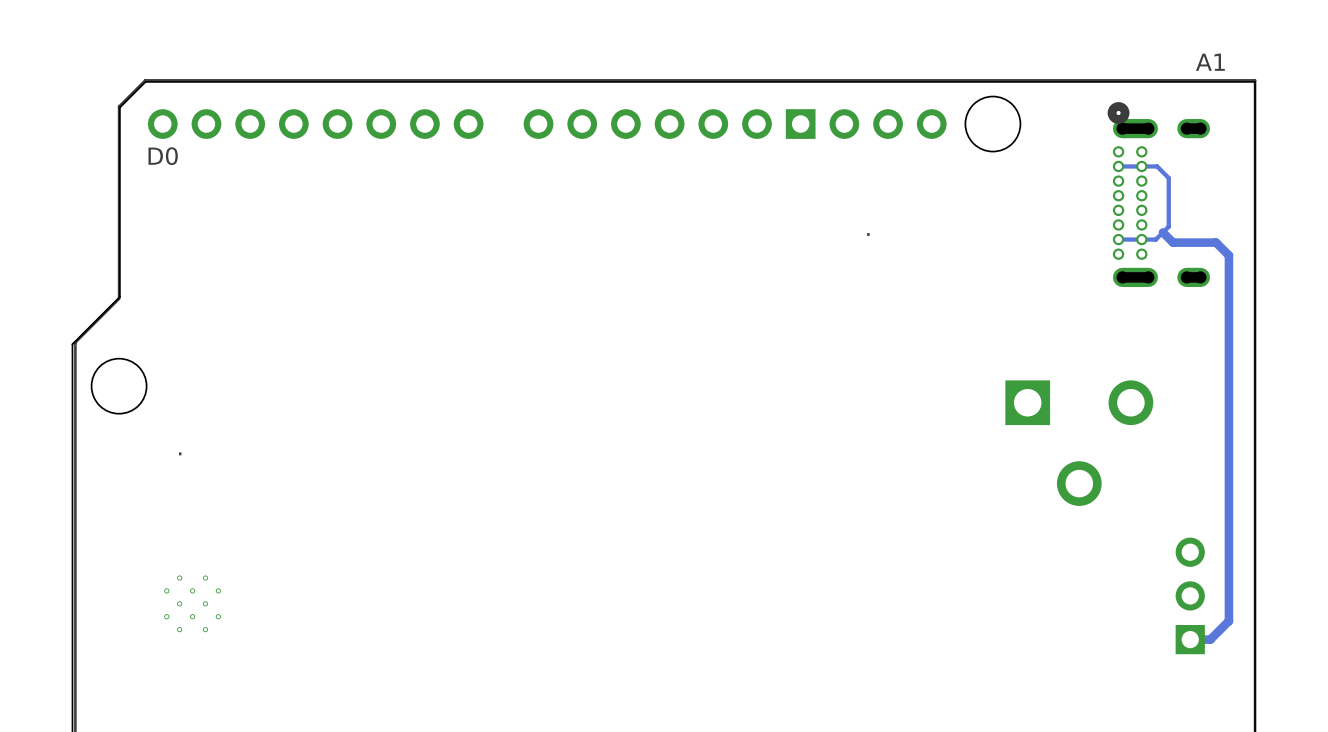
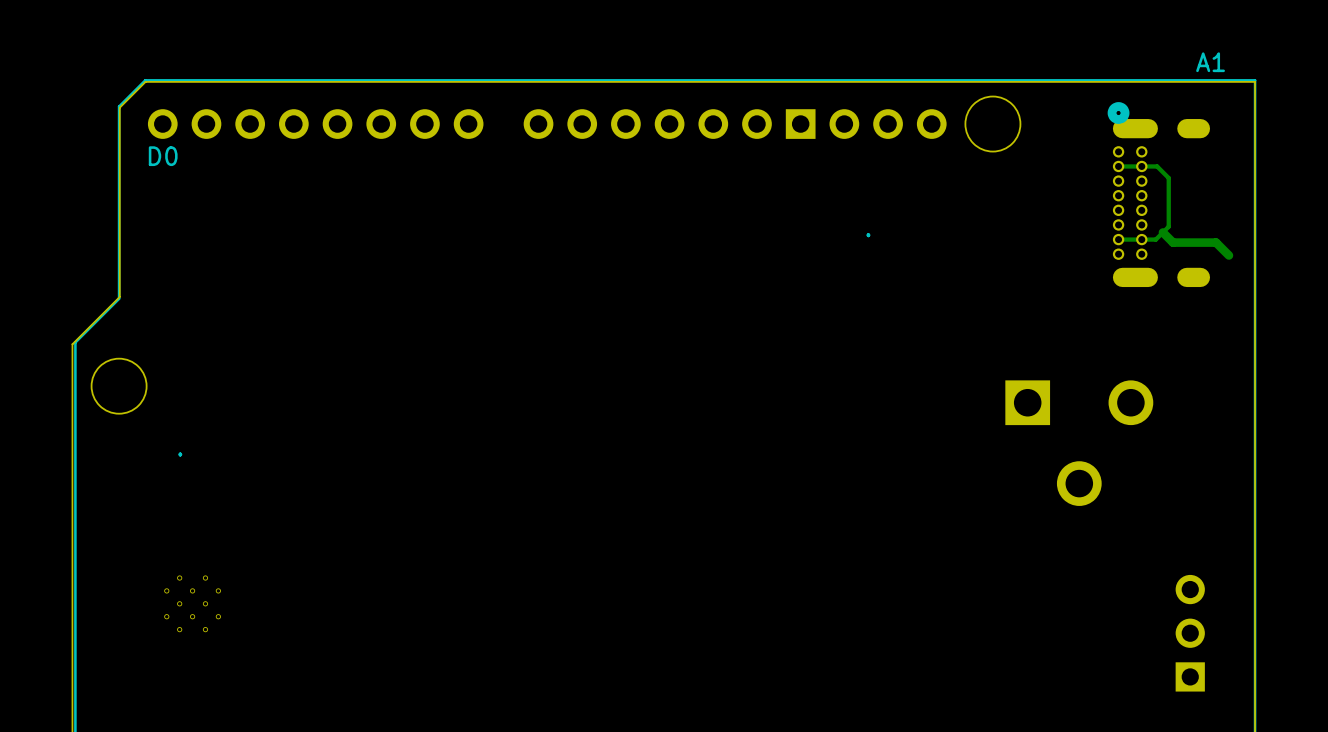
track: (1228, 255) (1228, 621) (1210, 639) (1190, 639) -> none
part position: (1190, 595) -> (1190, 633)

